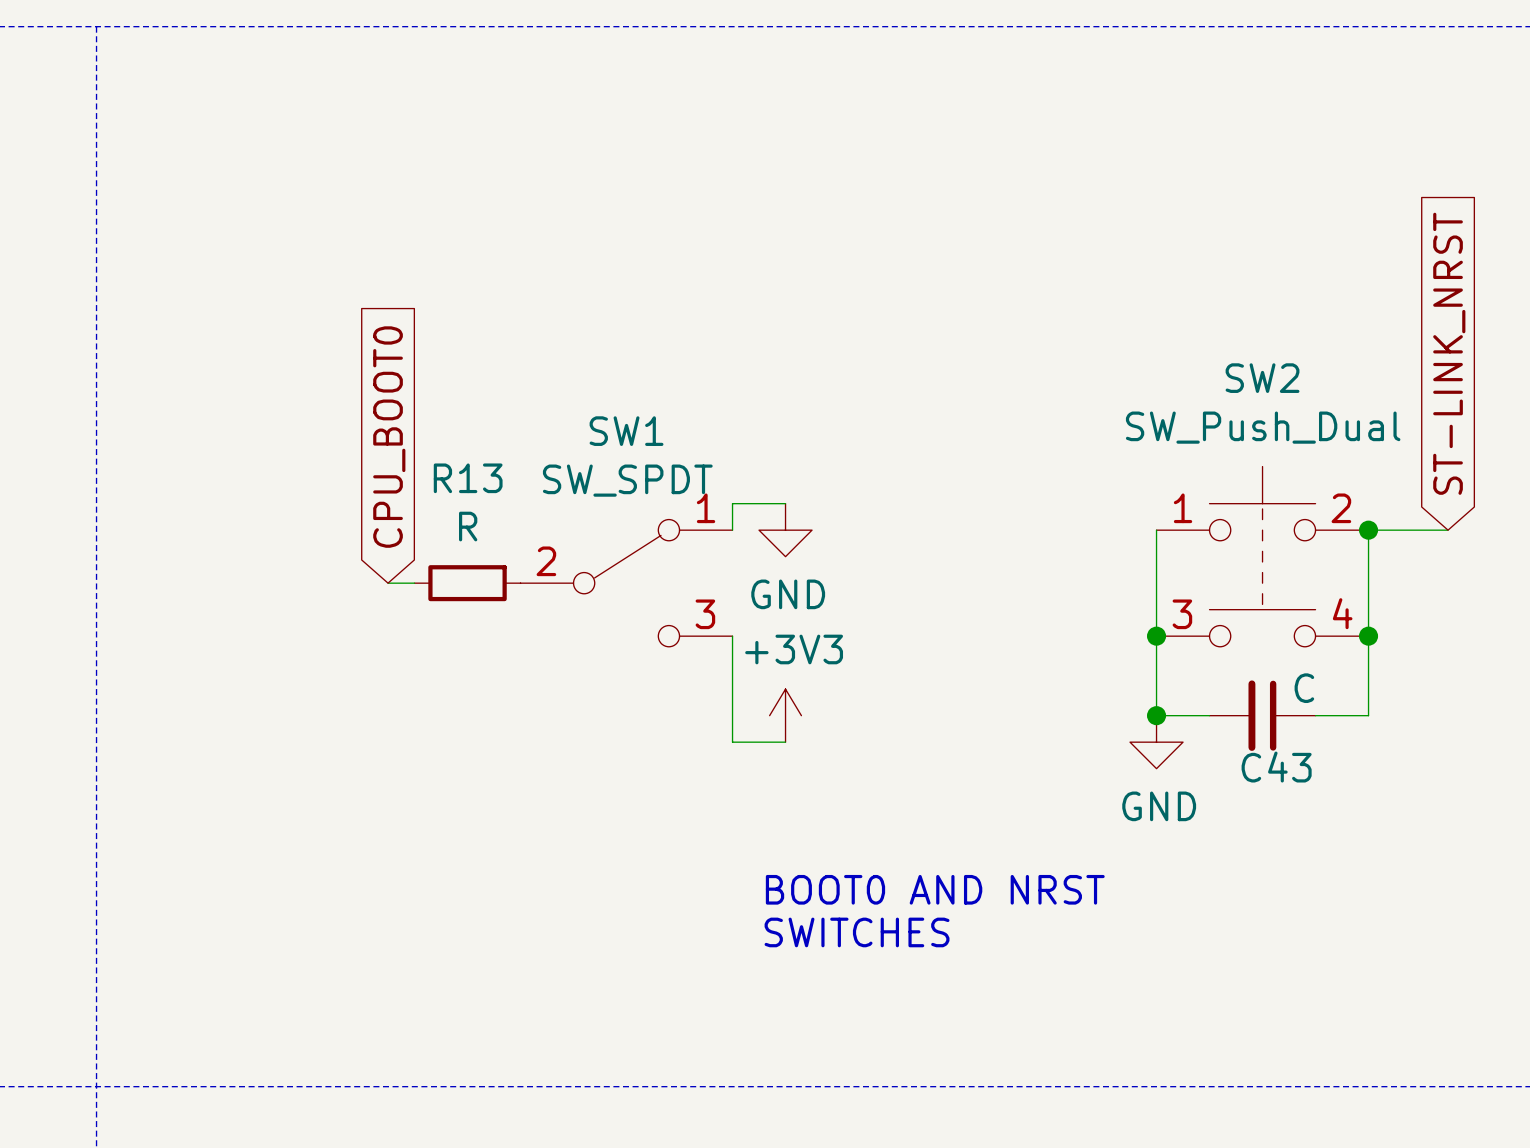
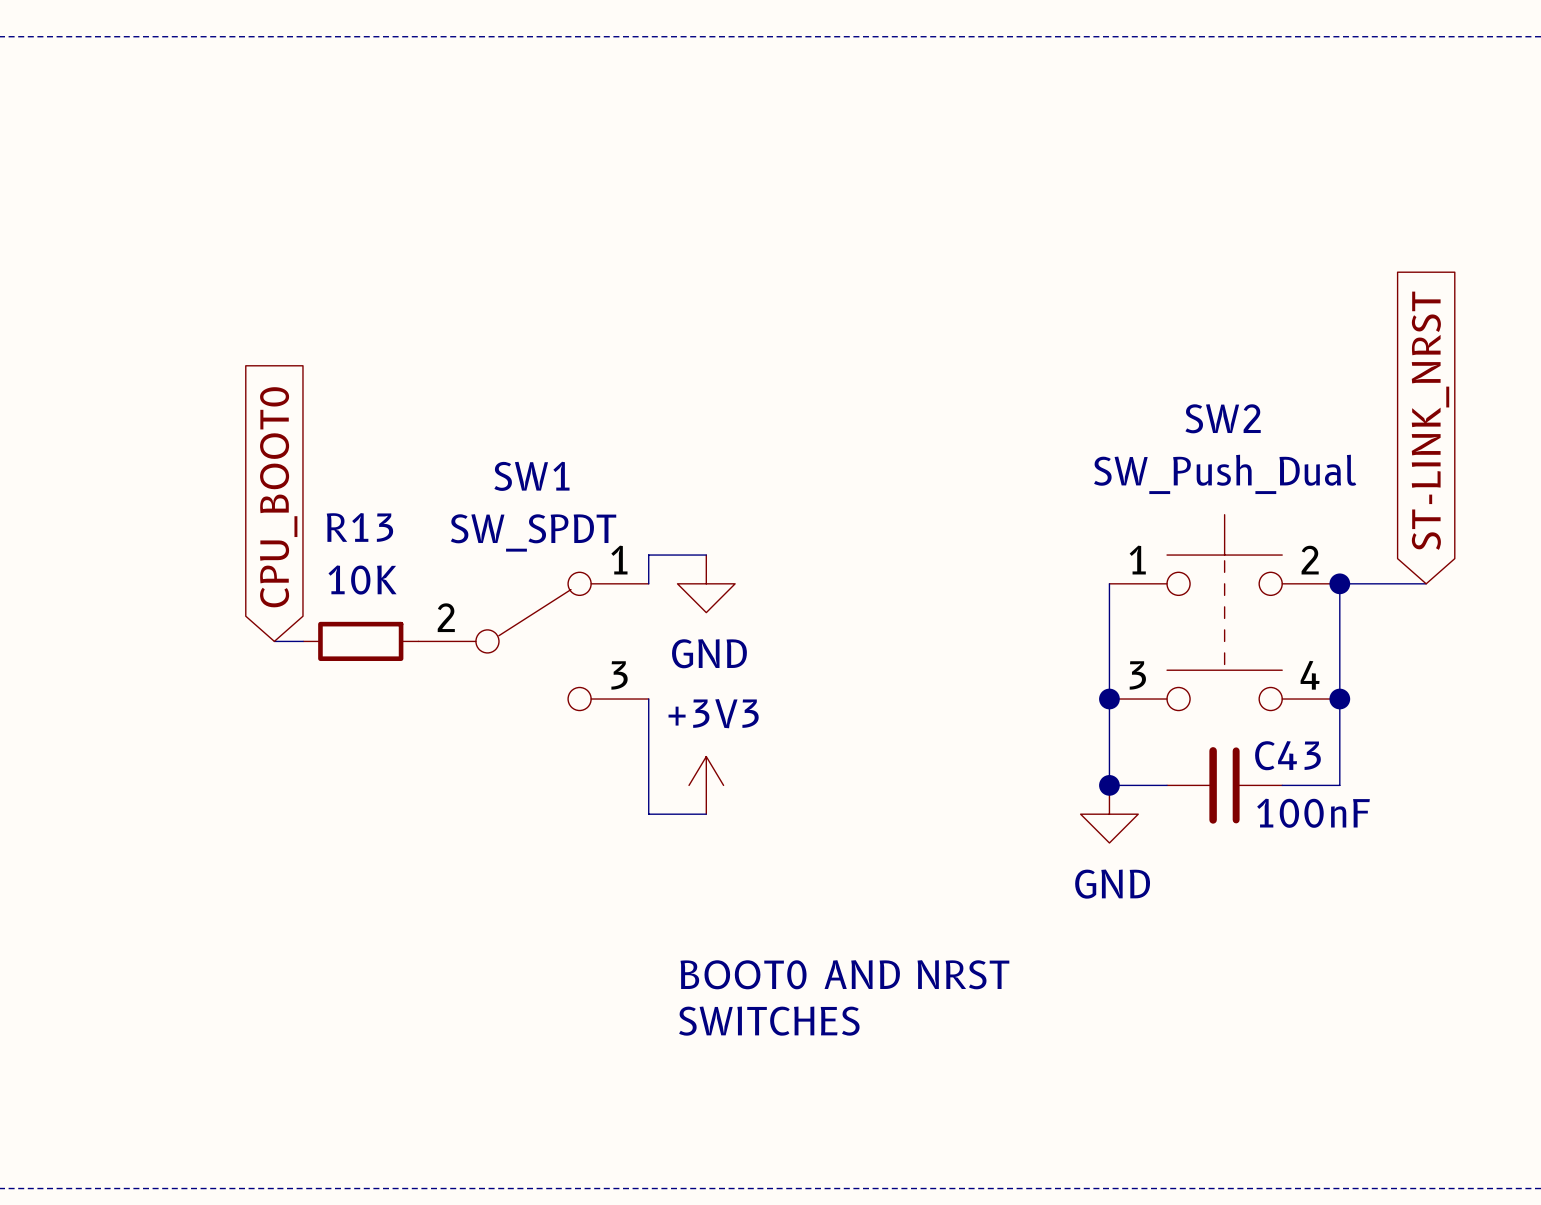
R13 value: R (468, 526) -> 10K (362, 580)
C43 value: C (1304, 688) -> 100nF (1313, 813)
C43 name position: C43 (1276, 767) -> C43 (1287, 755)

